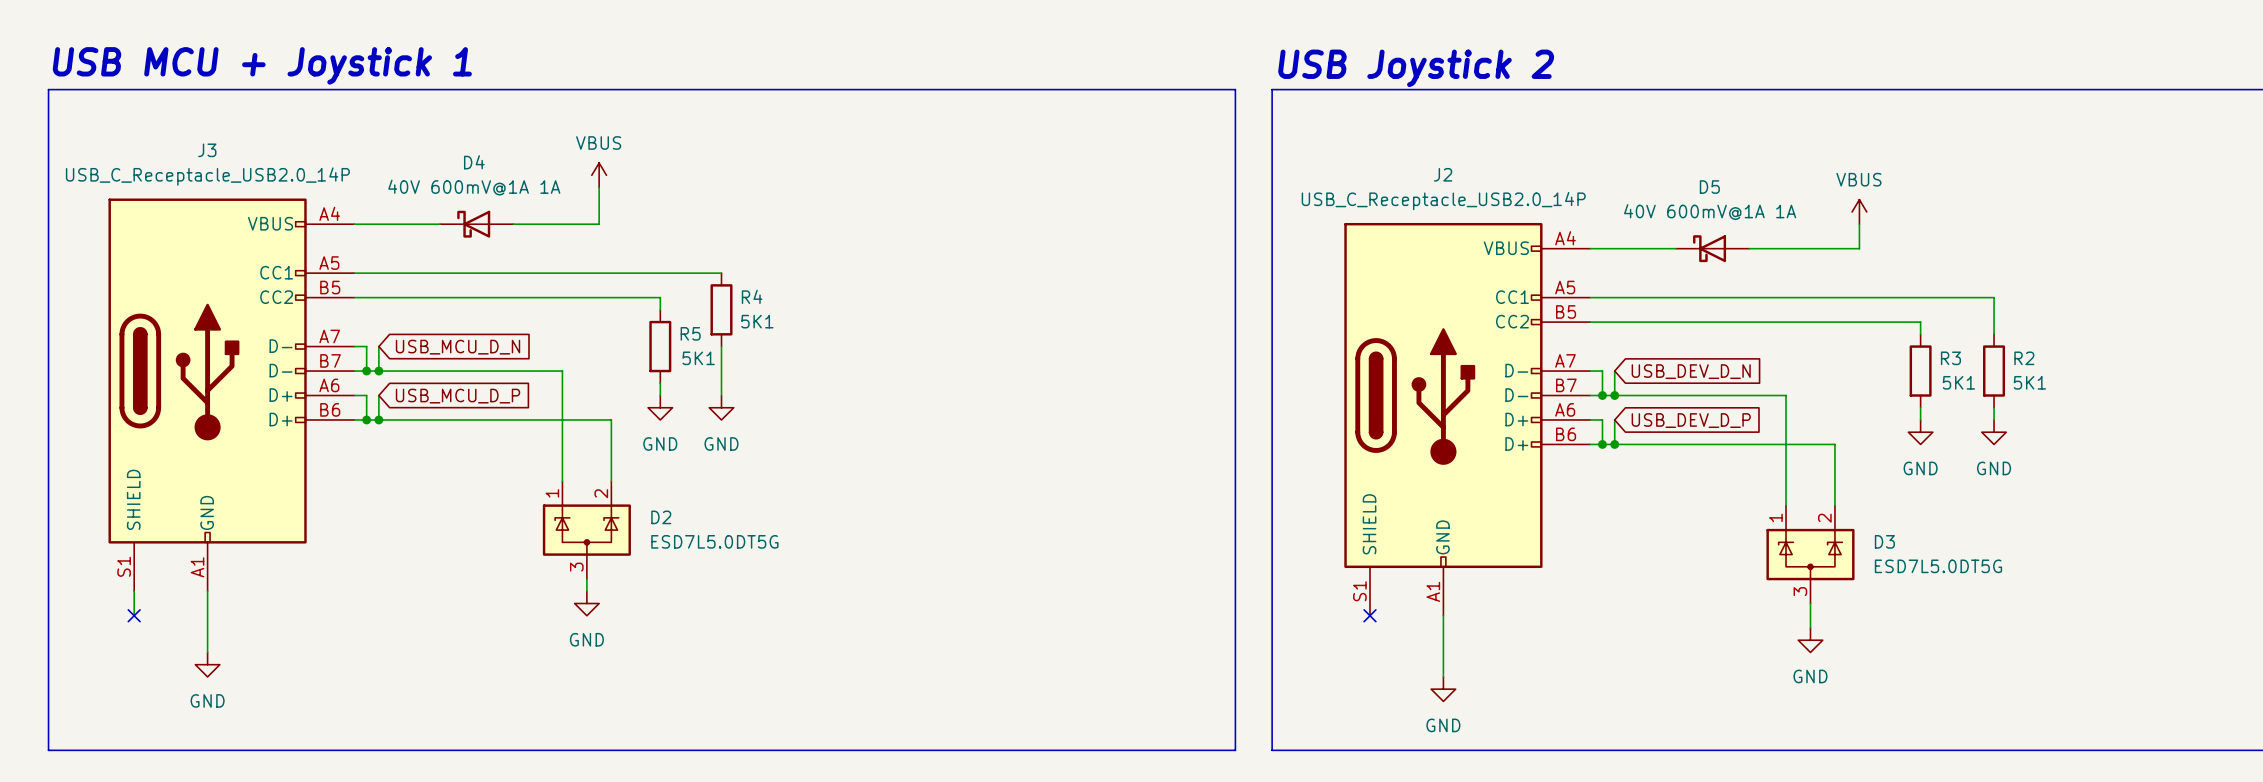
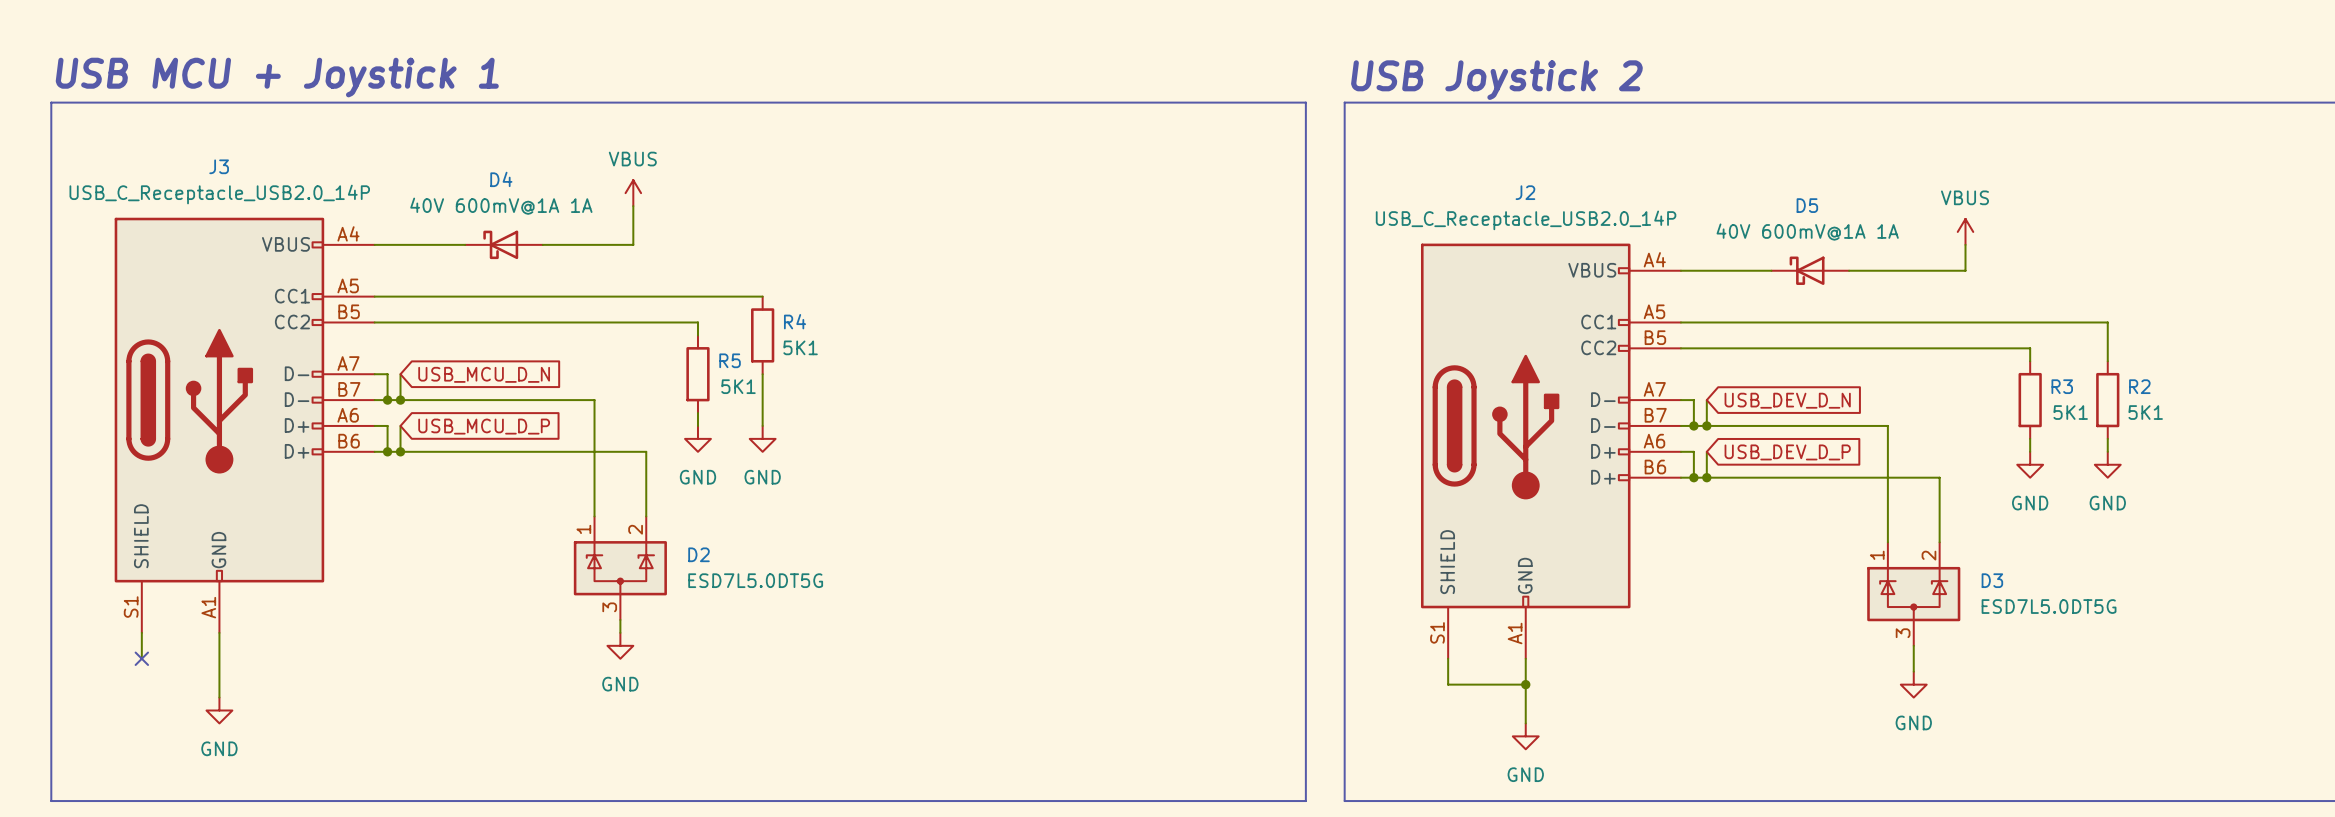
wire: none -> (1448, 658) (1448, 684) (1525, 684)
no-connect mark: (1370, 615) -> none
junction: none -> (1525, 684)

